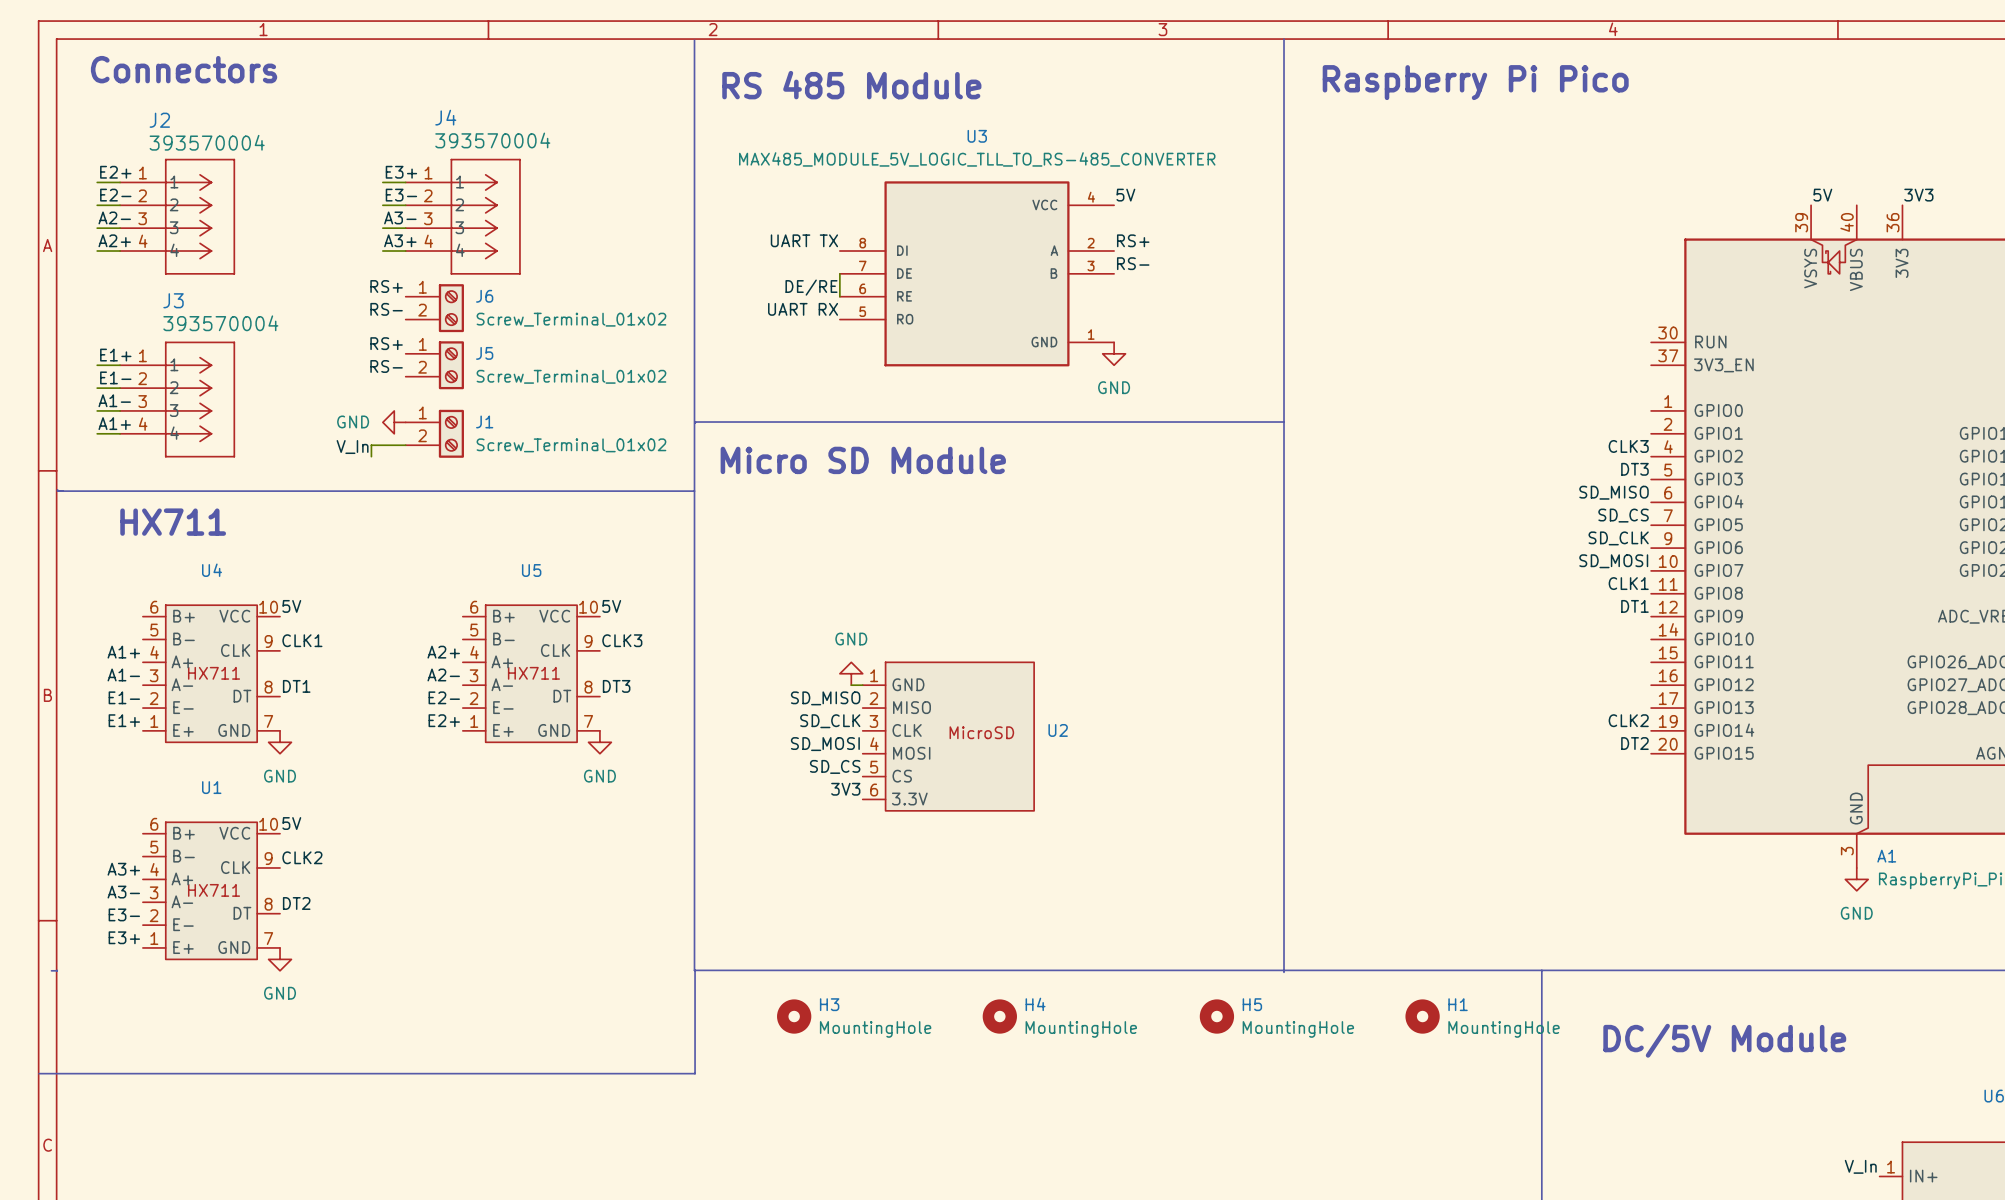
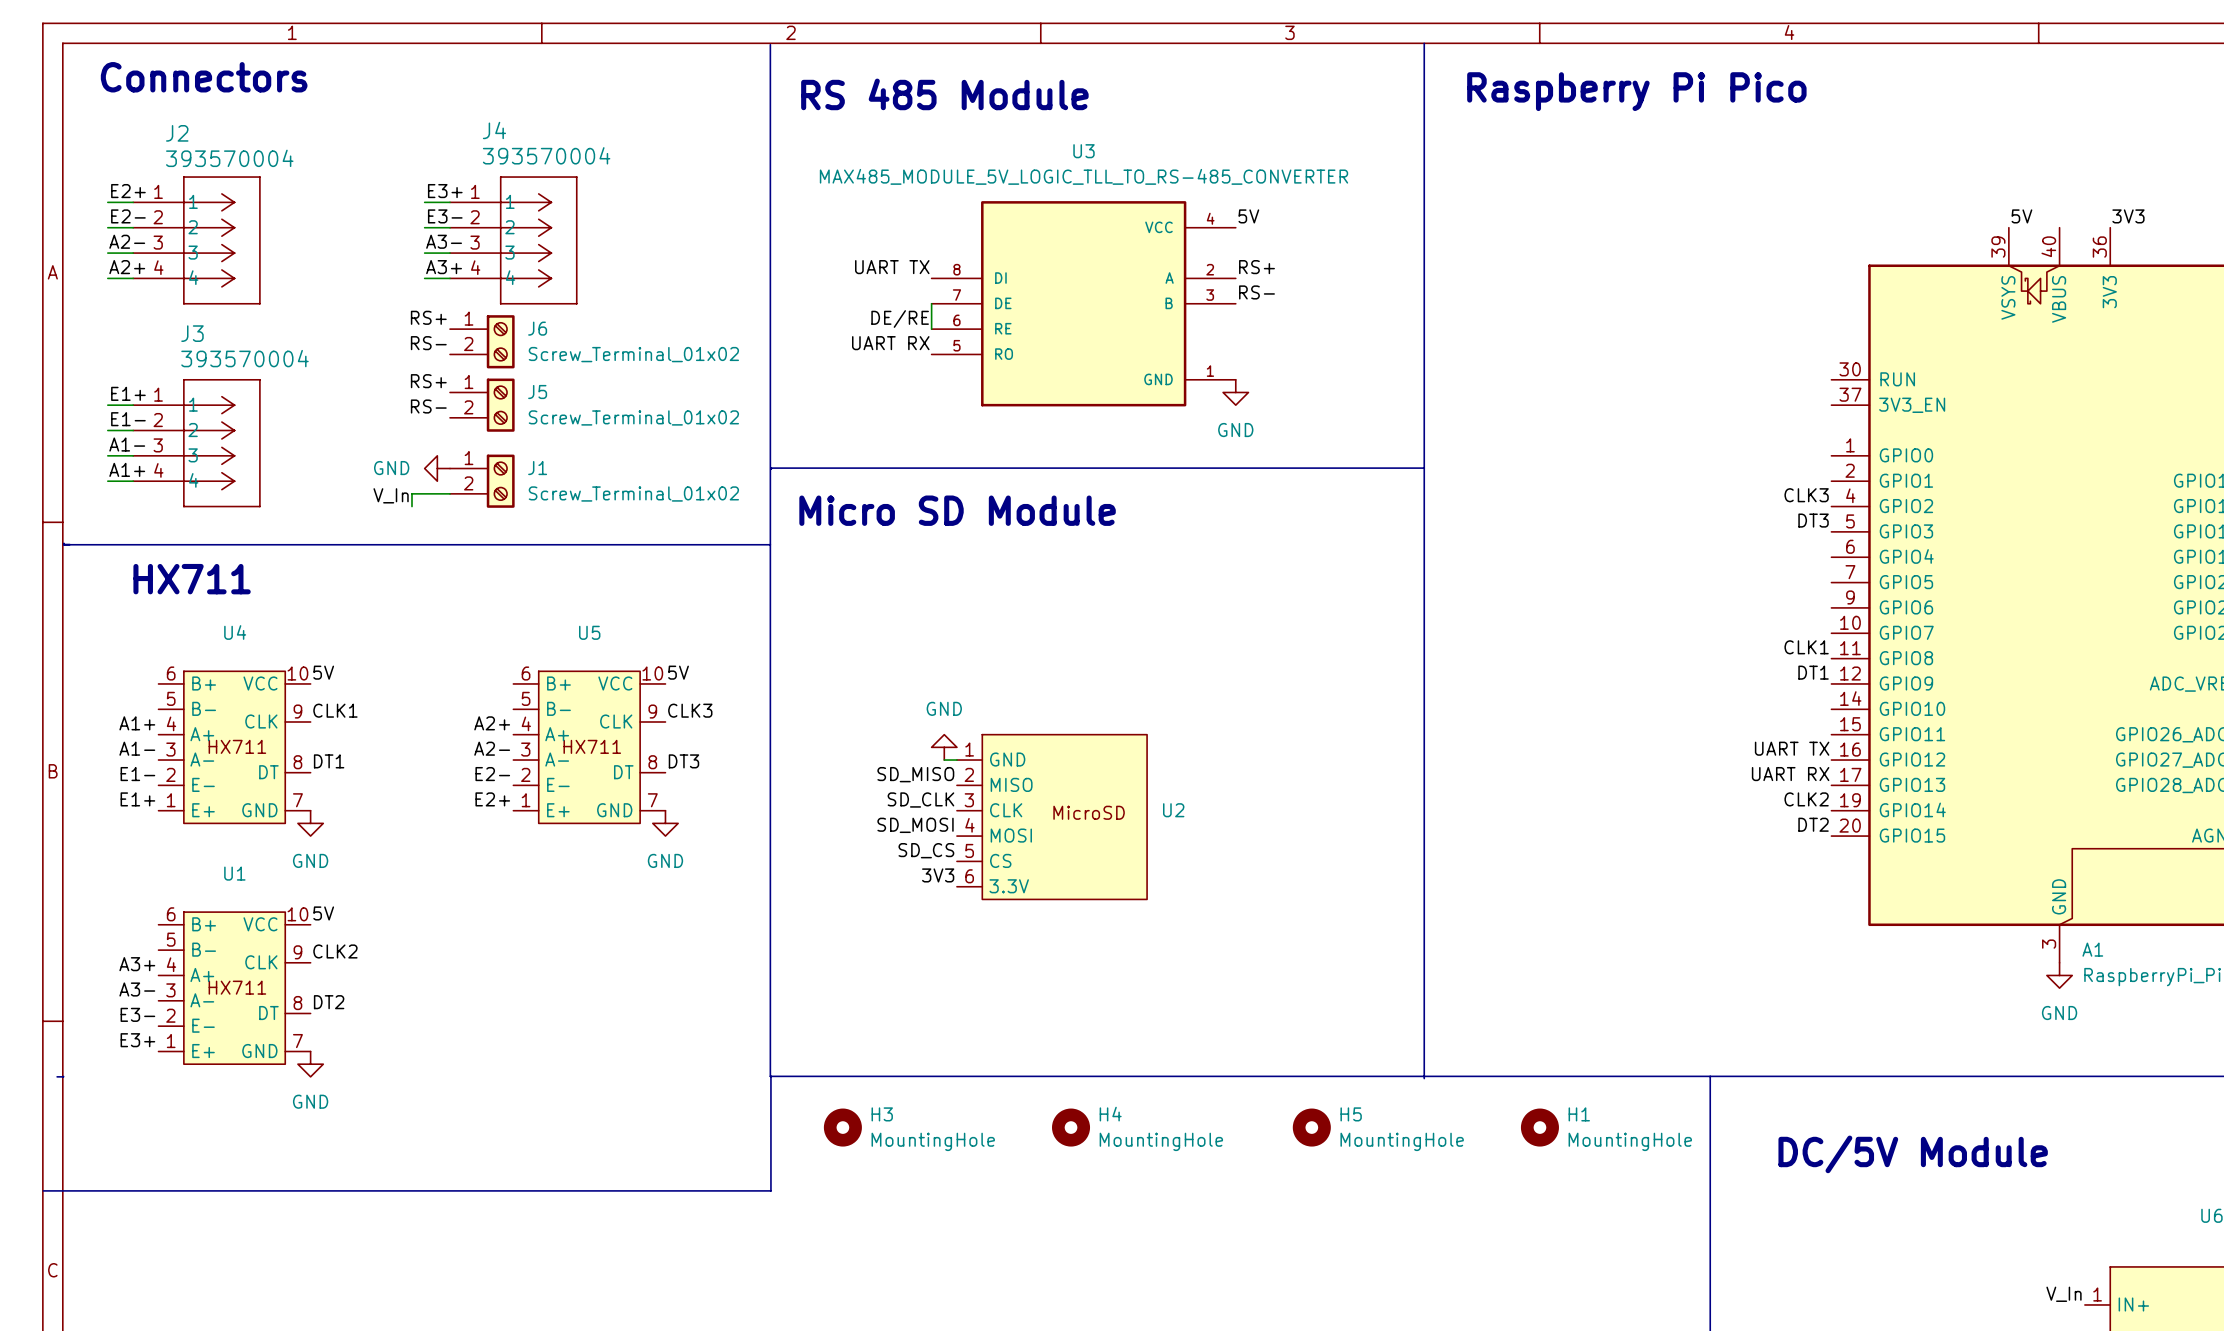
label: SD_MISO (1614, 492) -> none
label: SD_CS (1623, 515) -> none
label: SD_CLK (1618, 538) -> none
label: SD_MOSI (1613, 561) -> none
label: none -> UART TX (1792, 748)
label: none -> UART RX (1790, 774)
H3 position: (794, 1016) -> (842, 1127)
H4 position: (999, 1016) -> (1071, 1127)
H5 position: (1216, 1016) -> (1311, 1127)
H1 position: (1422, 1016) -> (1539, 1127)

